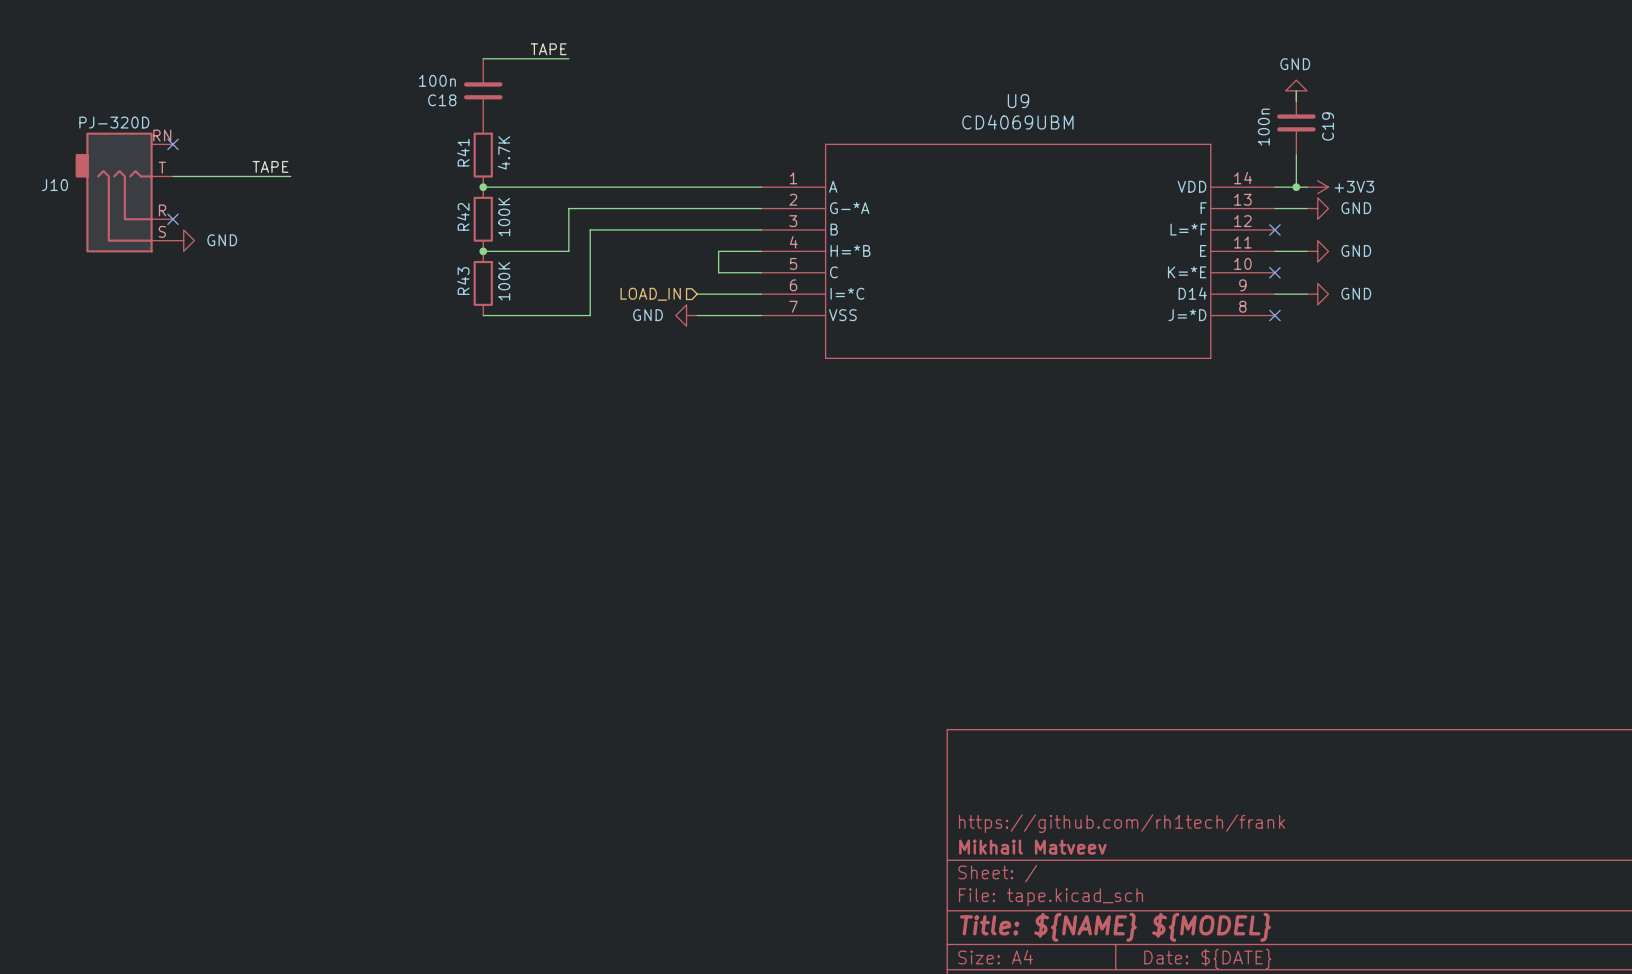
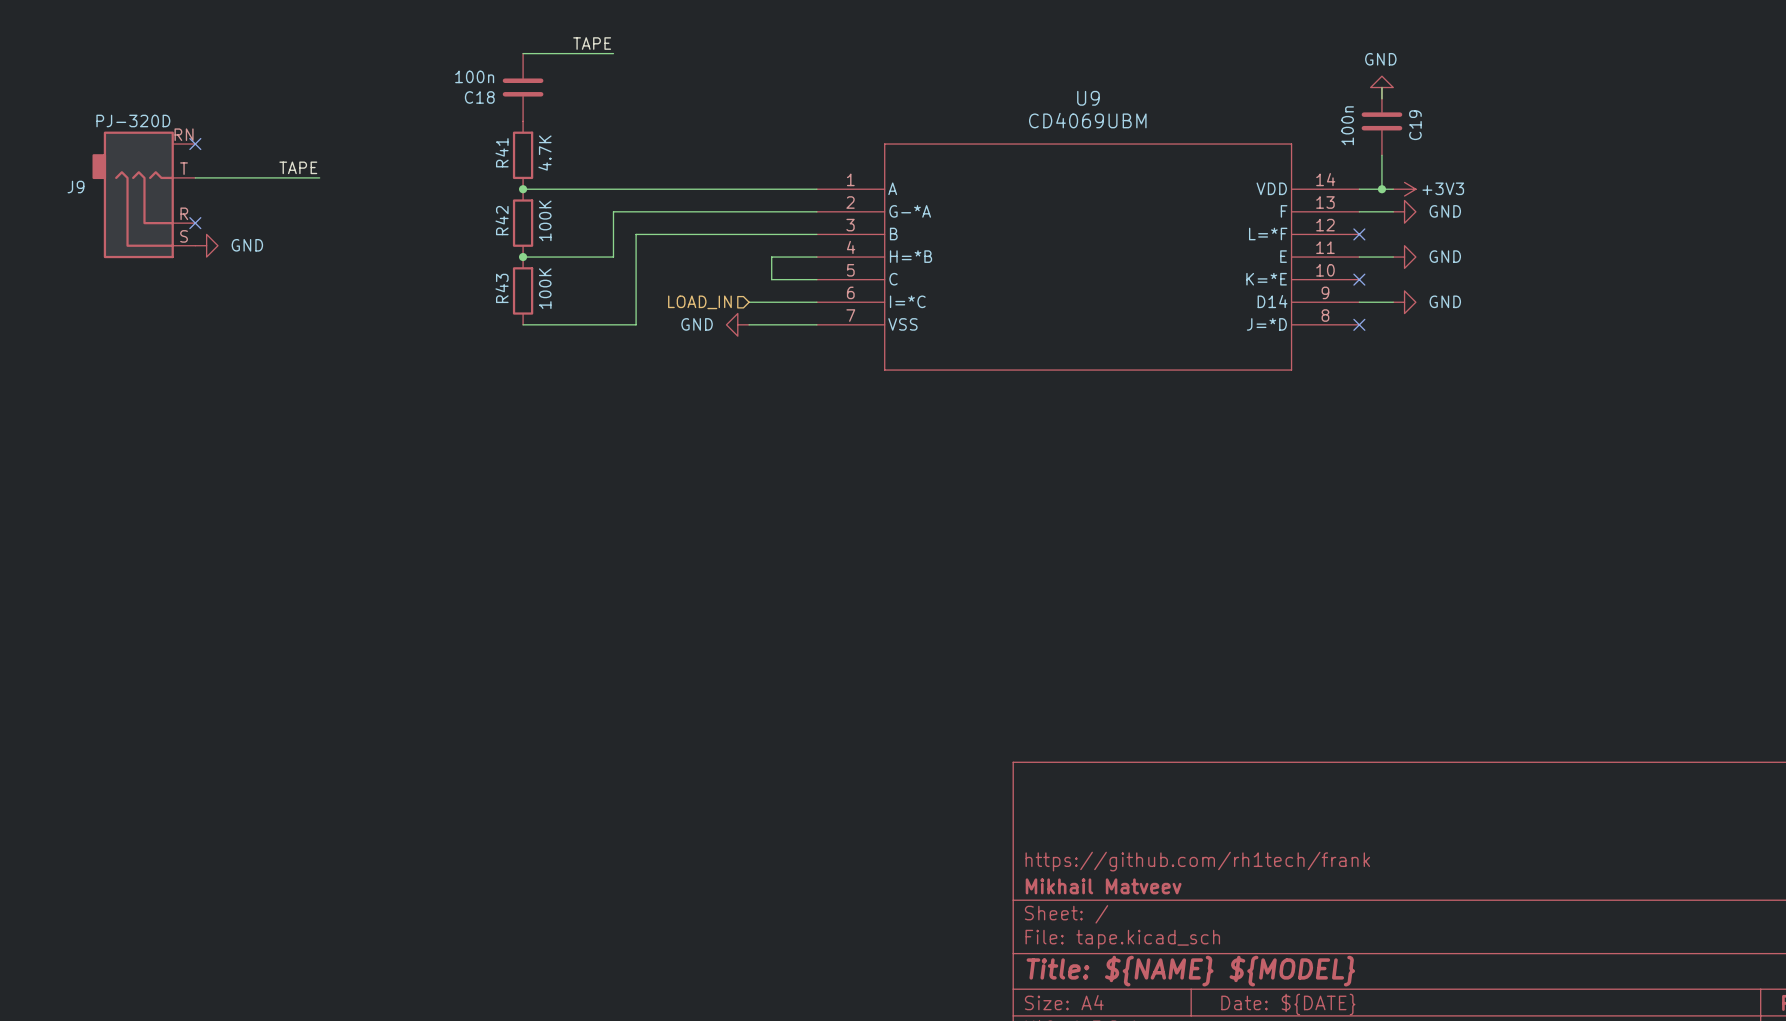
J10 name: J10 (54, 185) -> J9 (76, 187)

